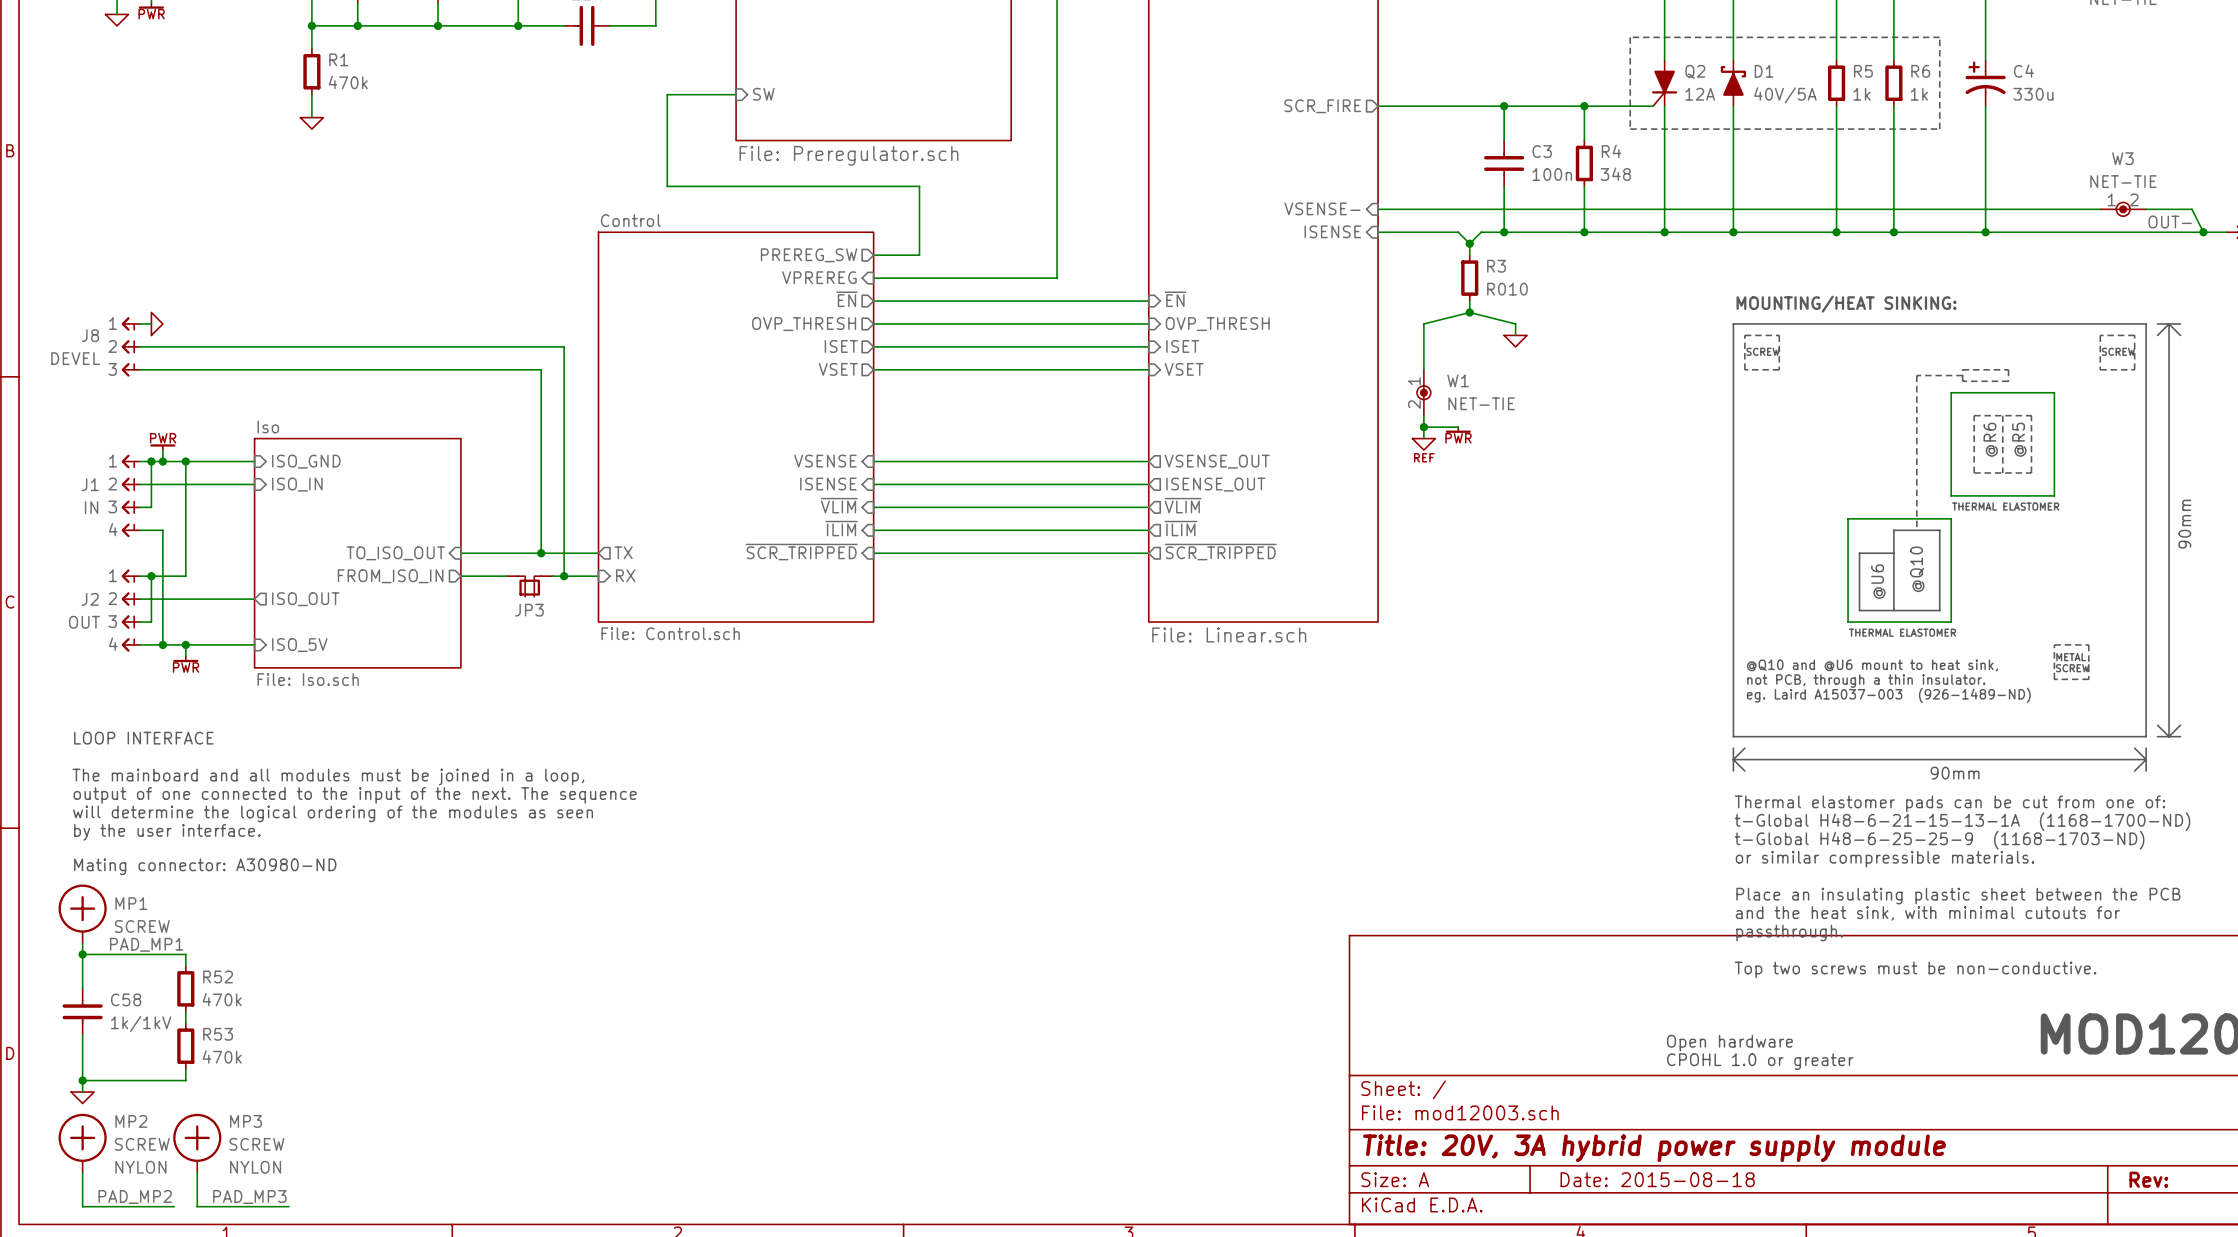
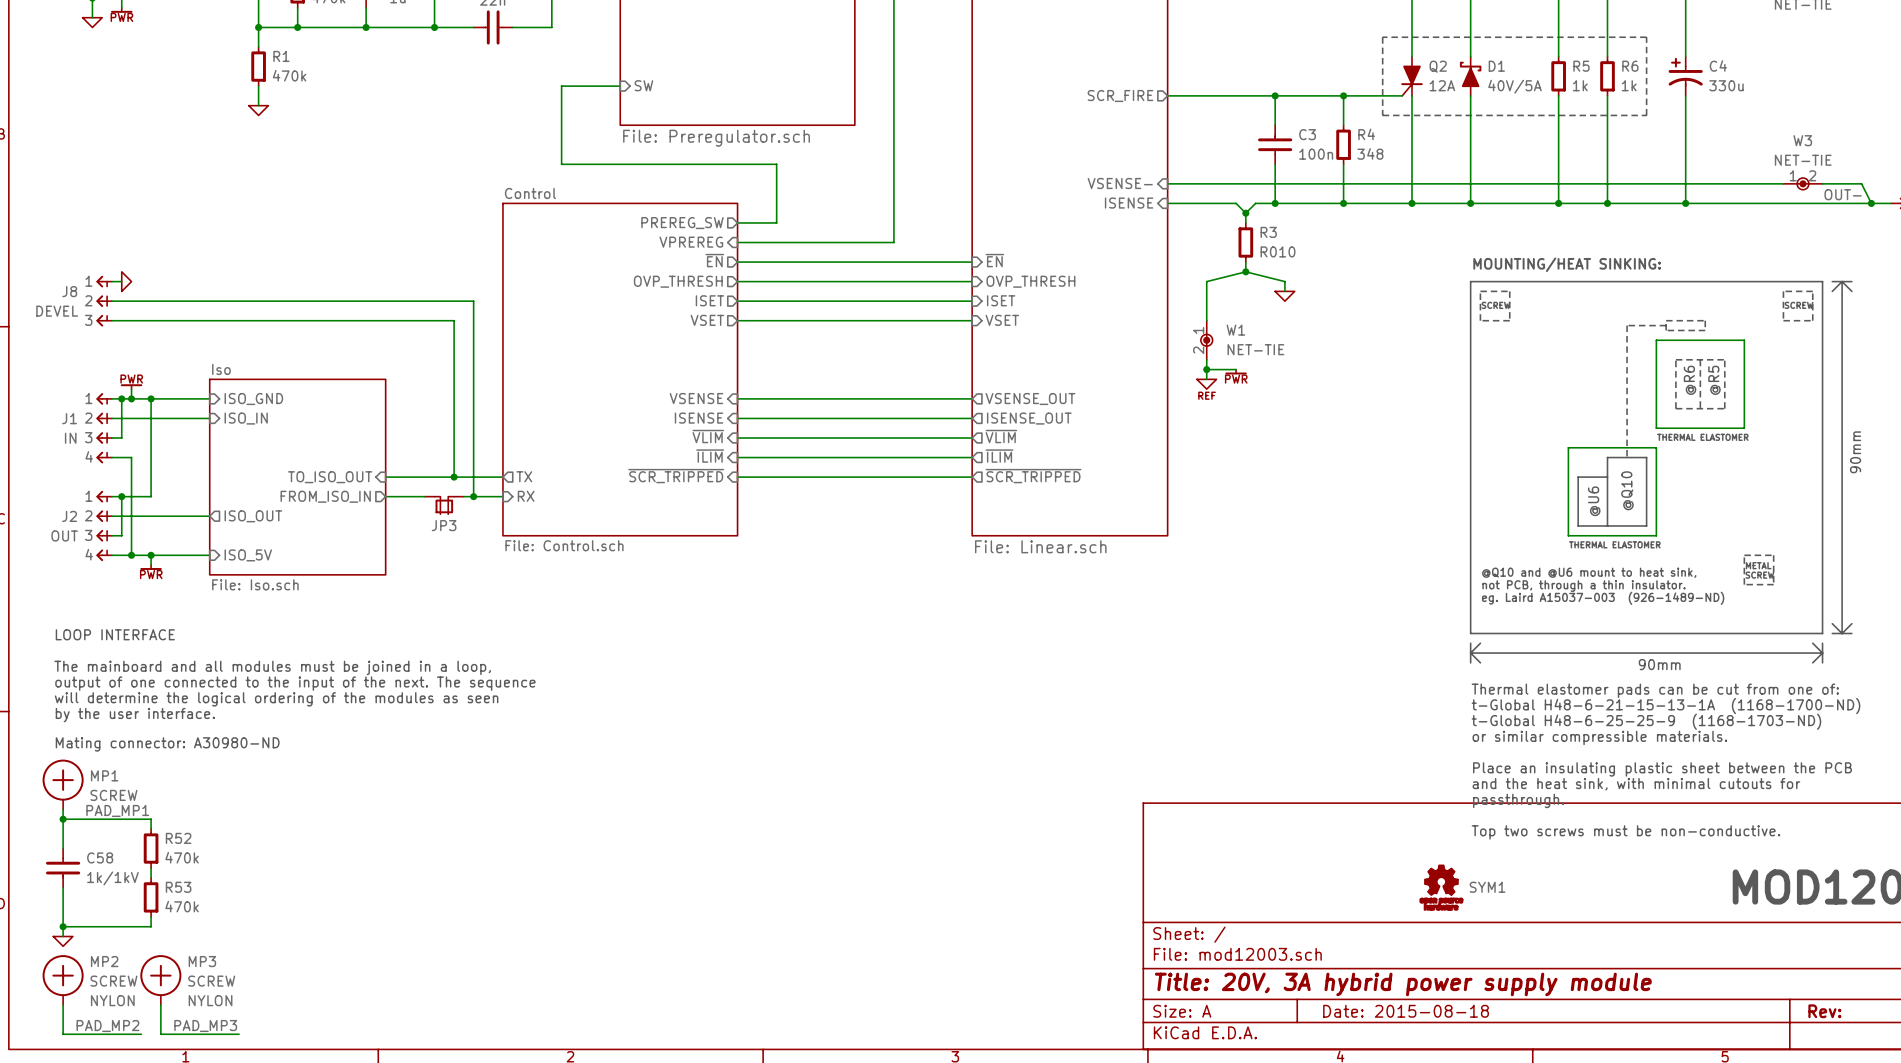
SYM1: none -> (1441, 887)
text: Open hardware (1729, 1043) -> none
text: CPOHL 1.0 or greater (1760, 1061) -> none

